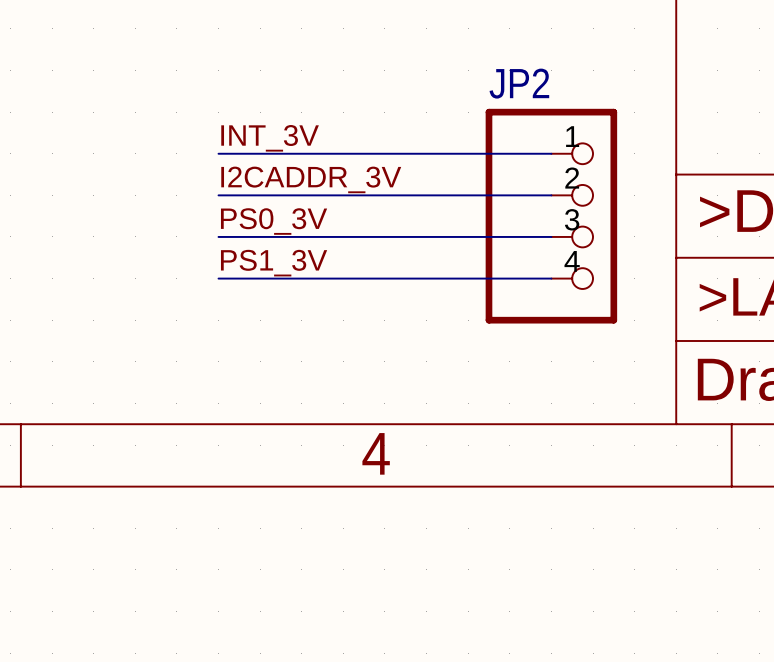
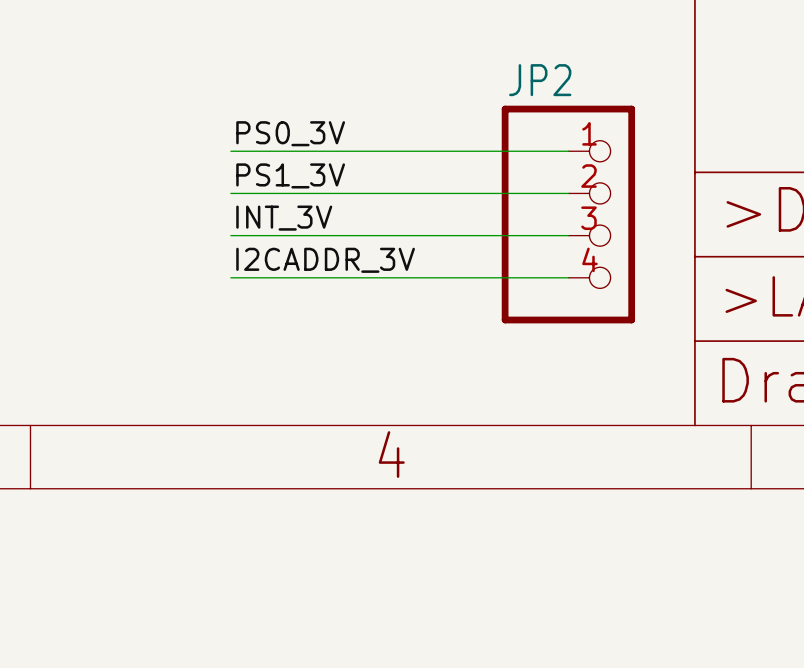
label: INT_3V (270, 138) -> PS0_3V (290, 133)
label: I2CADDR_3V (311, 179) -> PS1_3V (290, 175)
label: PS0_3V (274, 221) -> INT_3V (284, 218)
label: PS1_3V (274, 263) -> I2CADDR_3V (325, 260)

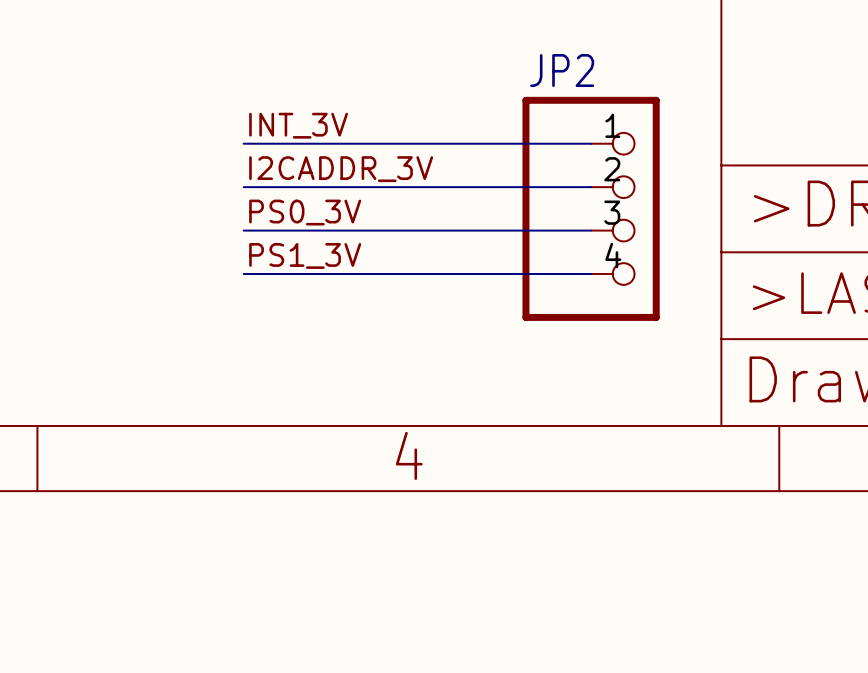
label: PS0_3V (290, 133) -> INT_3V (298, 125)
label: PS1_3V (290, 175) -> I2CADDR_3V (341, 169)
label: INT_3V (284, 218) -> PS0_3V (305, 212)
label: I2CADDR_3V (325, 260) -> PS1_3V (305, 255)

